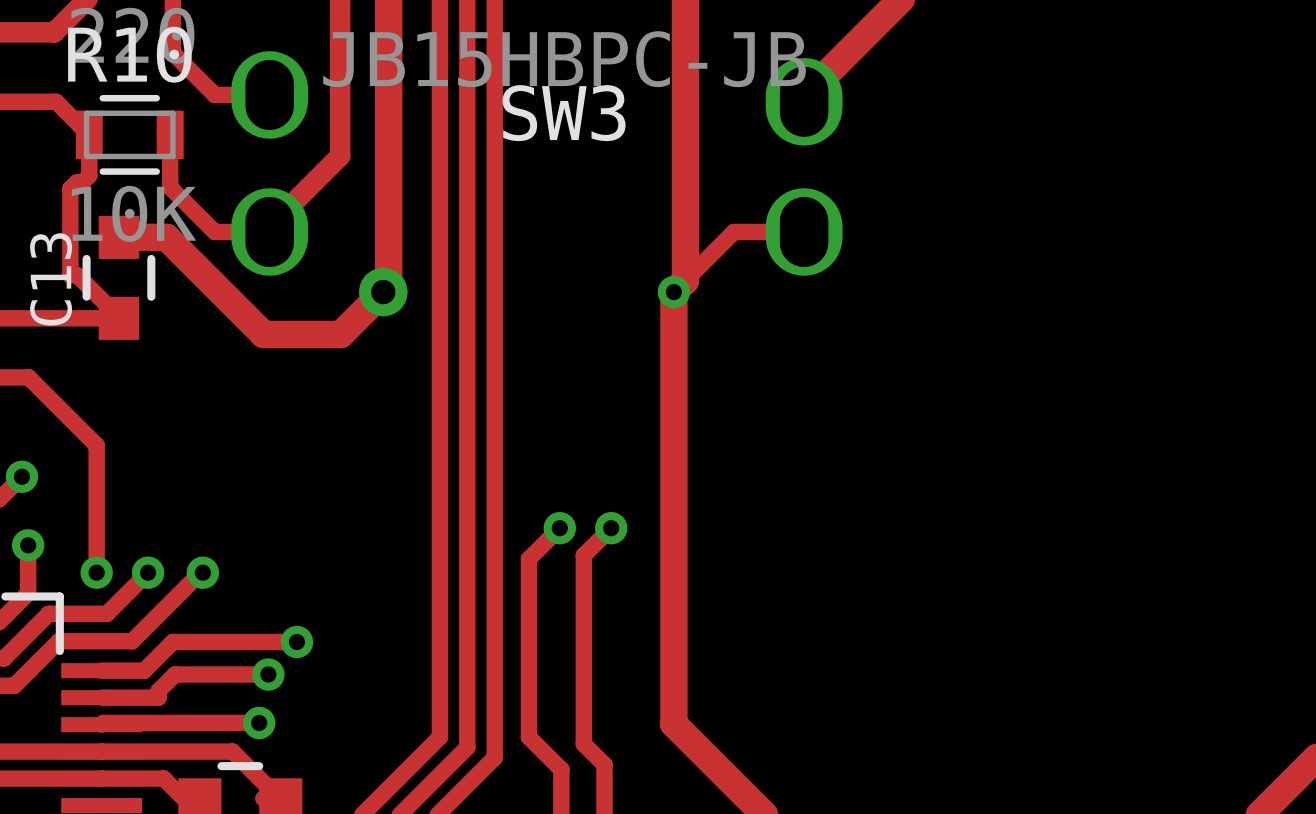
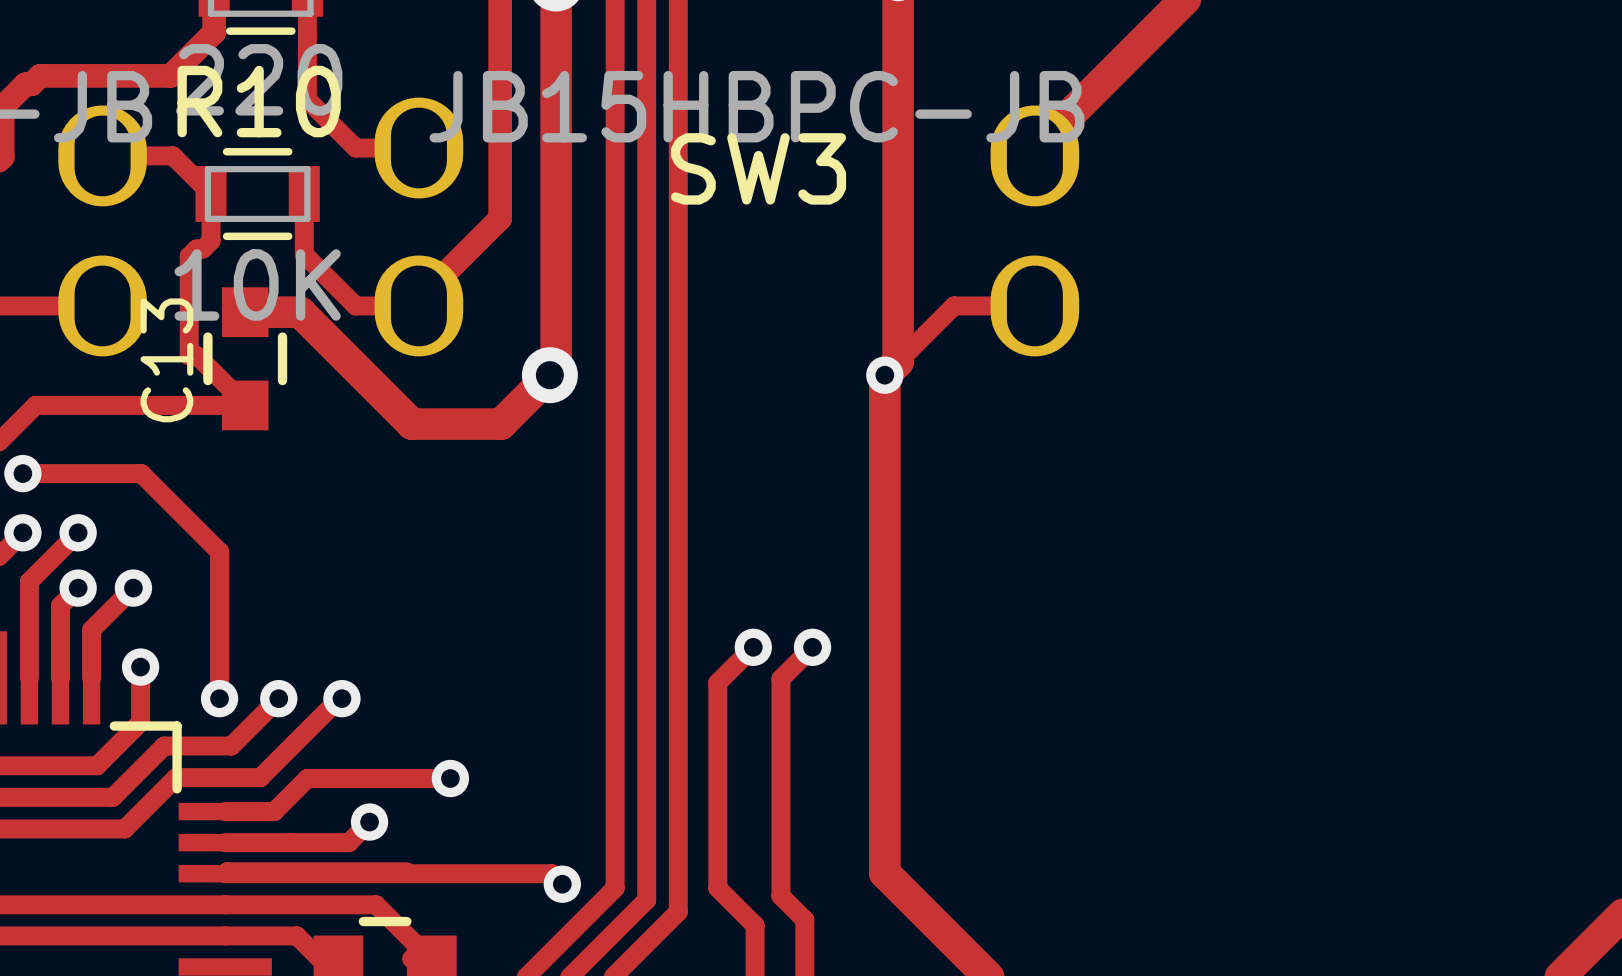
track: (268, 674) (175, 674) (158, 691) (158, 697) -> (369, 822) (348, 842) (290, 842)
via: (268, 674) -> none
via: none -> (369, 822)
via: (259, 722) -> none
track: none -> (225, 873) (551, 873) (562, 884)
via: none -> (562, 884)

